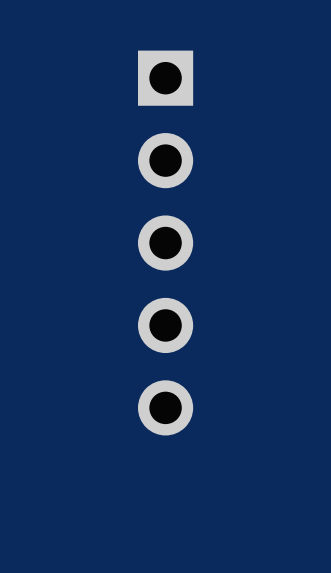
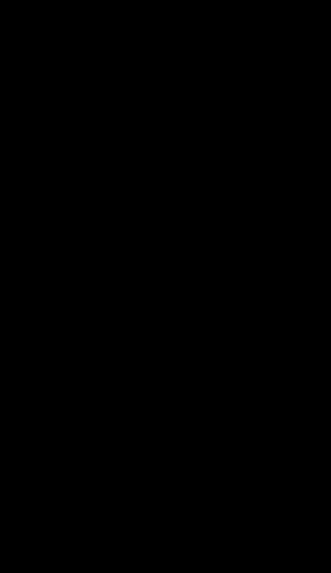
part: (165, 243) -> none

